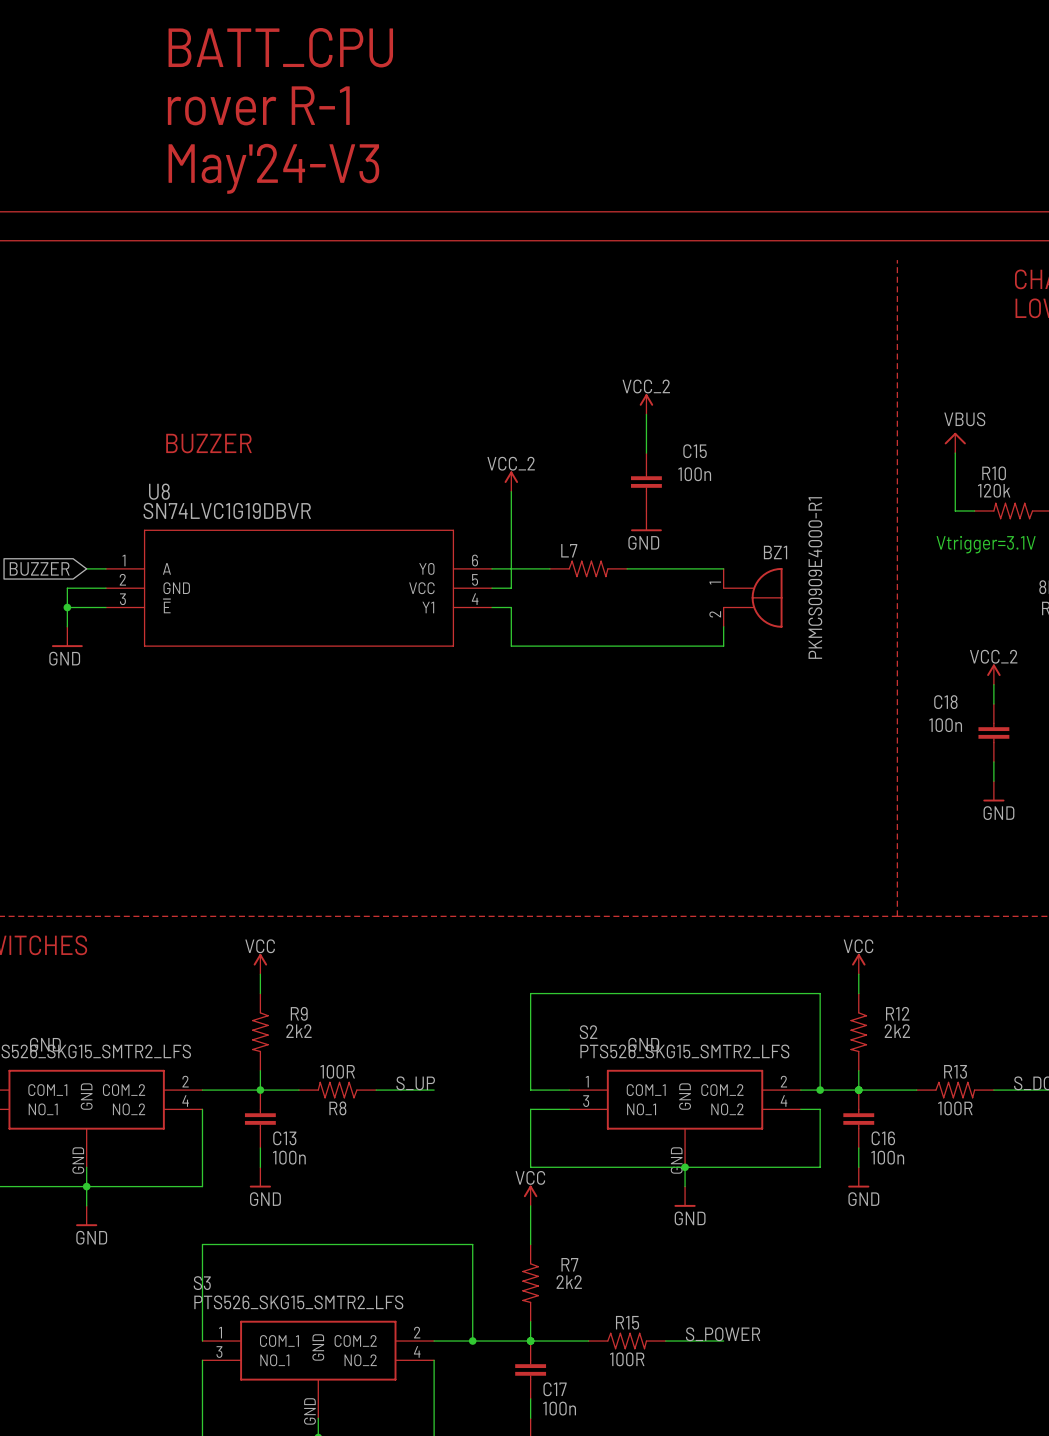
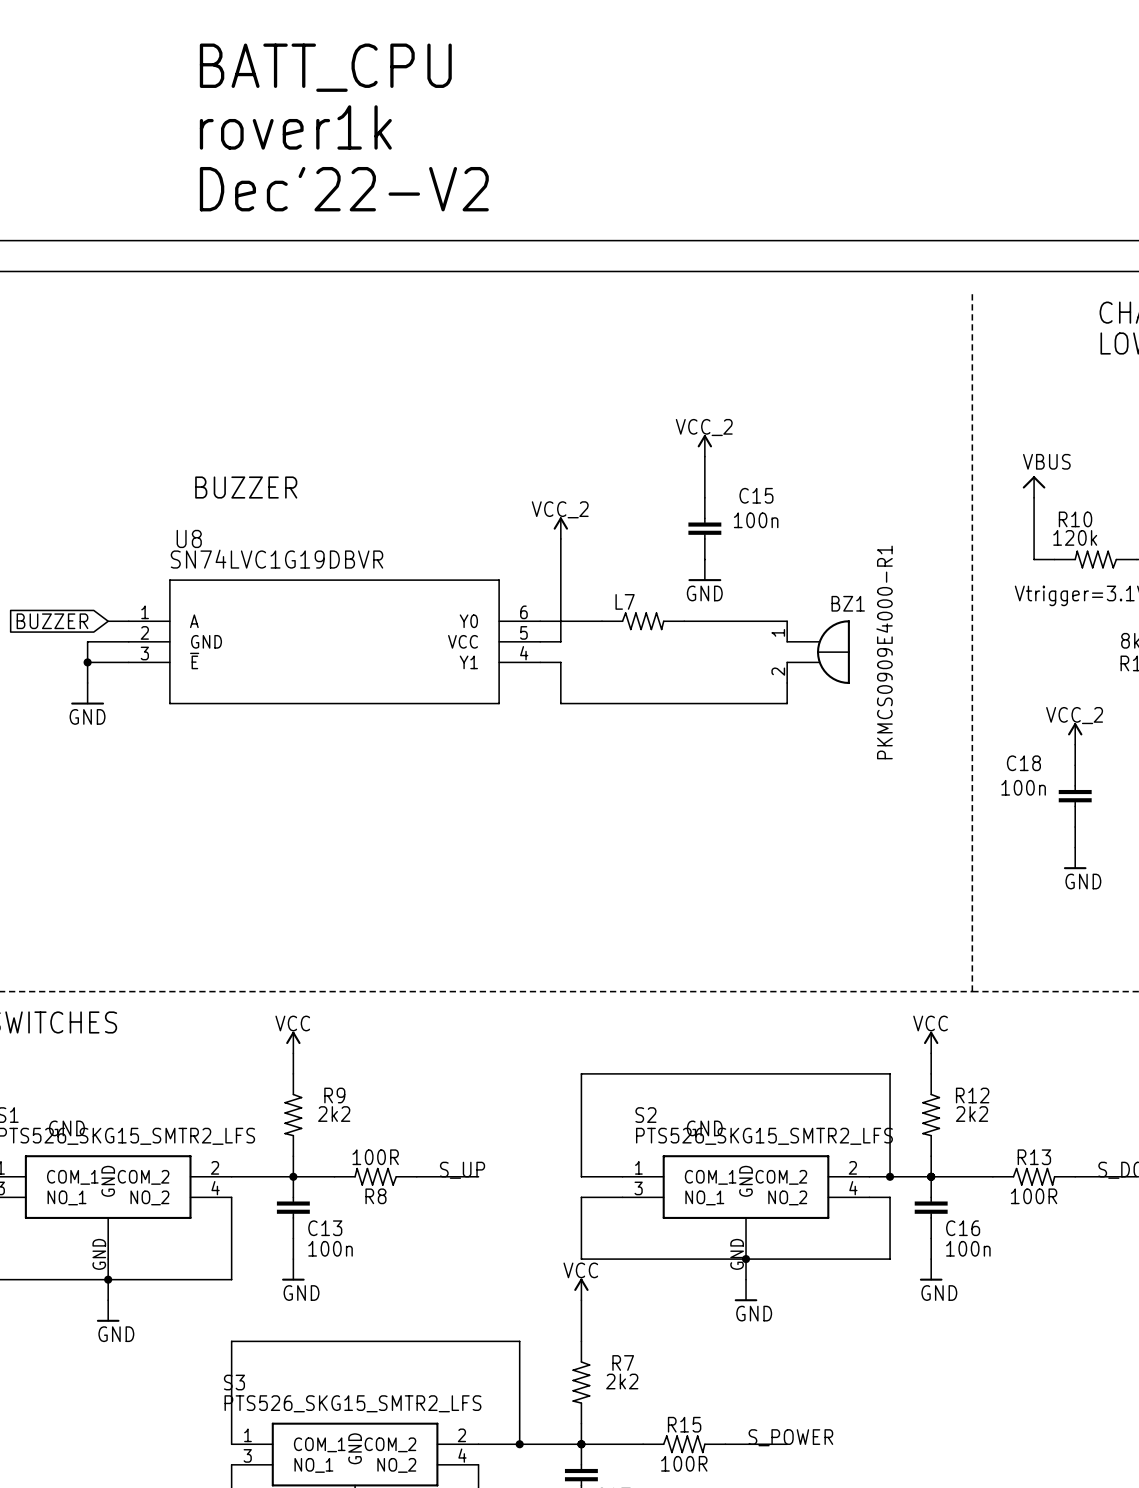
text: rover R-1 (258, 105) -> rover1k (295, 127)
text: May'24-V3 (273, 168) -> Dec'22-V2 (344, 189)

